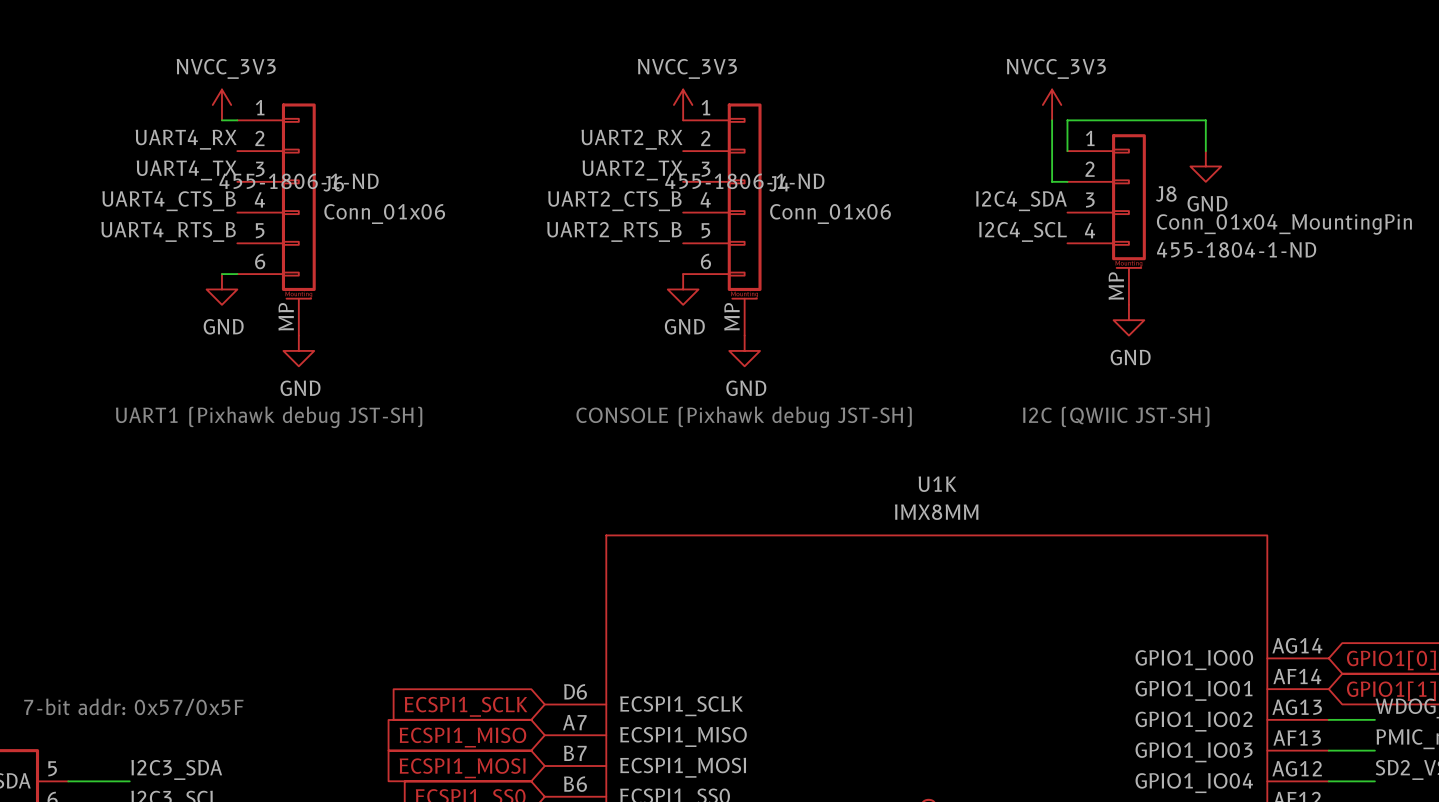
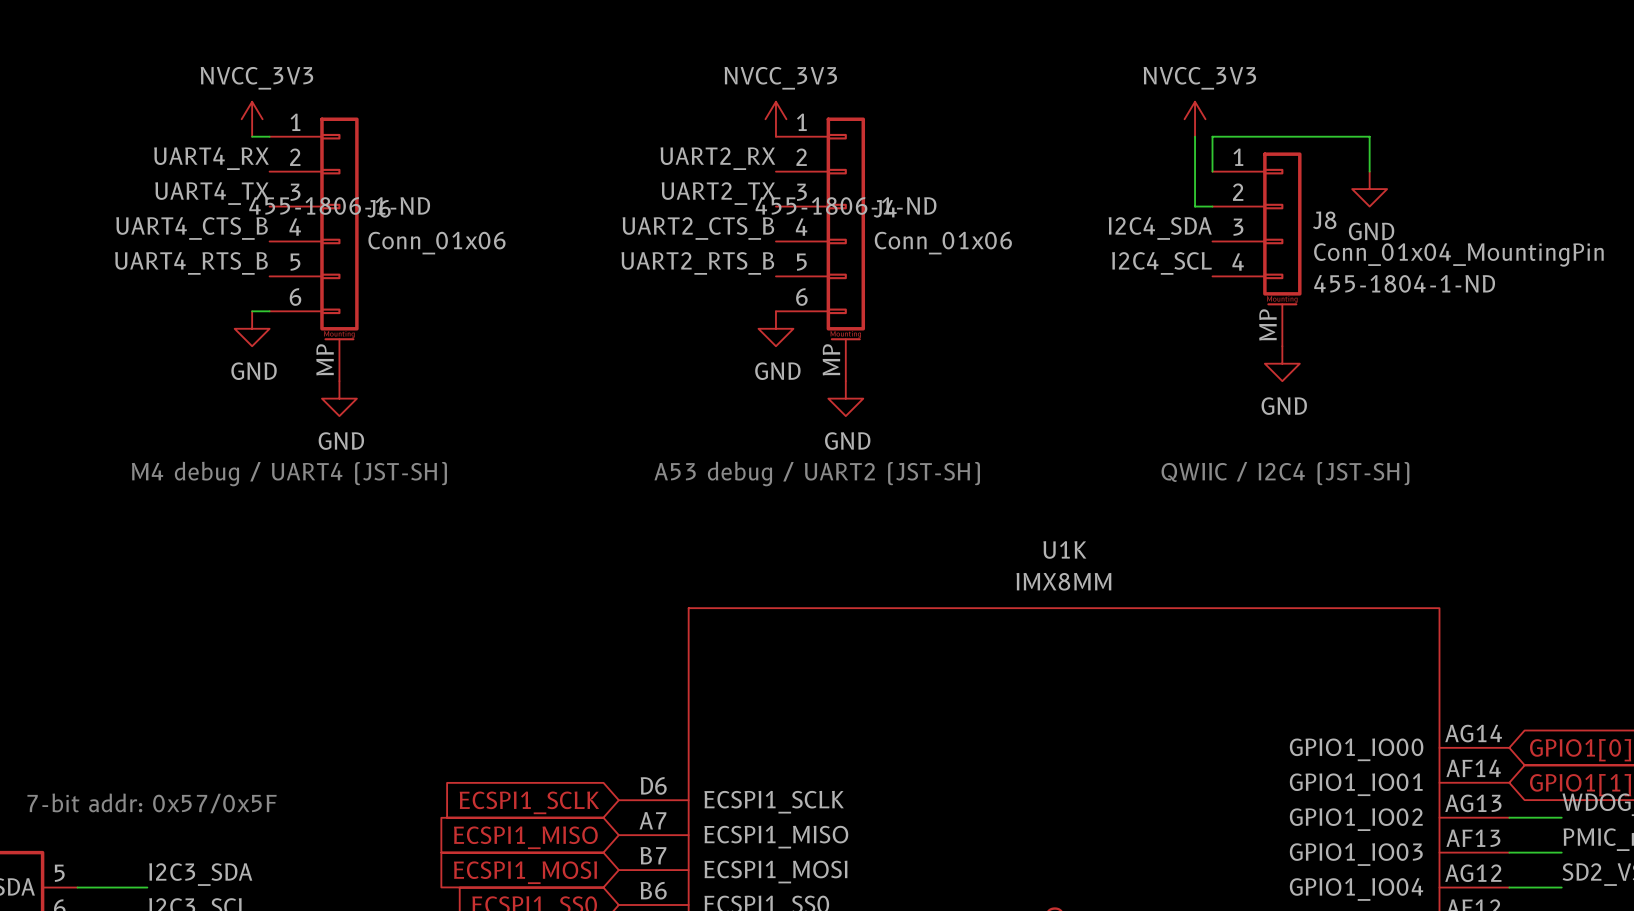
text: I2C (QWIIC JST-SH) (1116, 416) -> QWIIC / I2C4 (JST-SH) (1285, 473)
text: UART1 (Pixhawk debug JST-SH) (269, 417) -> M4 debug / UART4 (JST-SH) (289, 474)
text: CONSOLE (Pixhawk debug JST-SH) (744, 417) -> A53 debug / UART2 (JST-SH) (817, 474)

